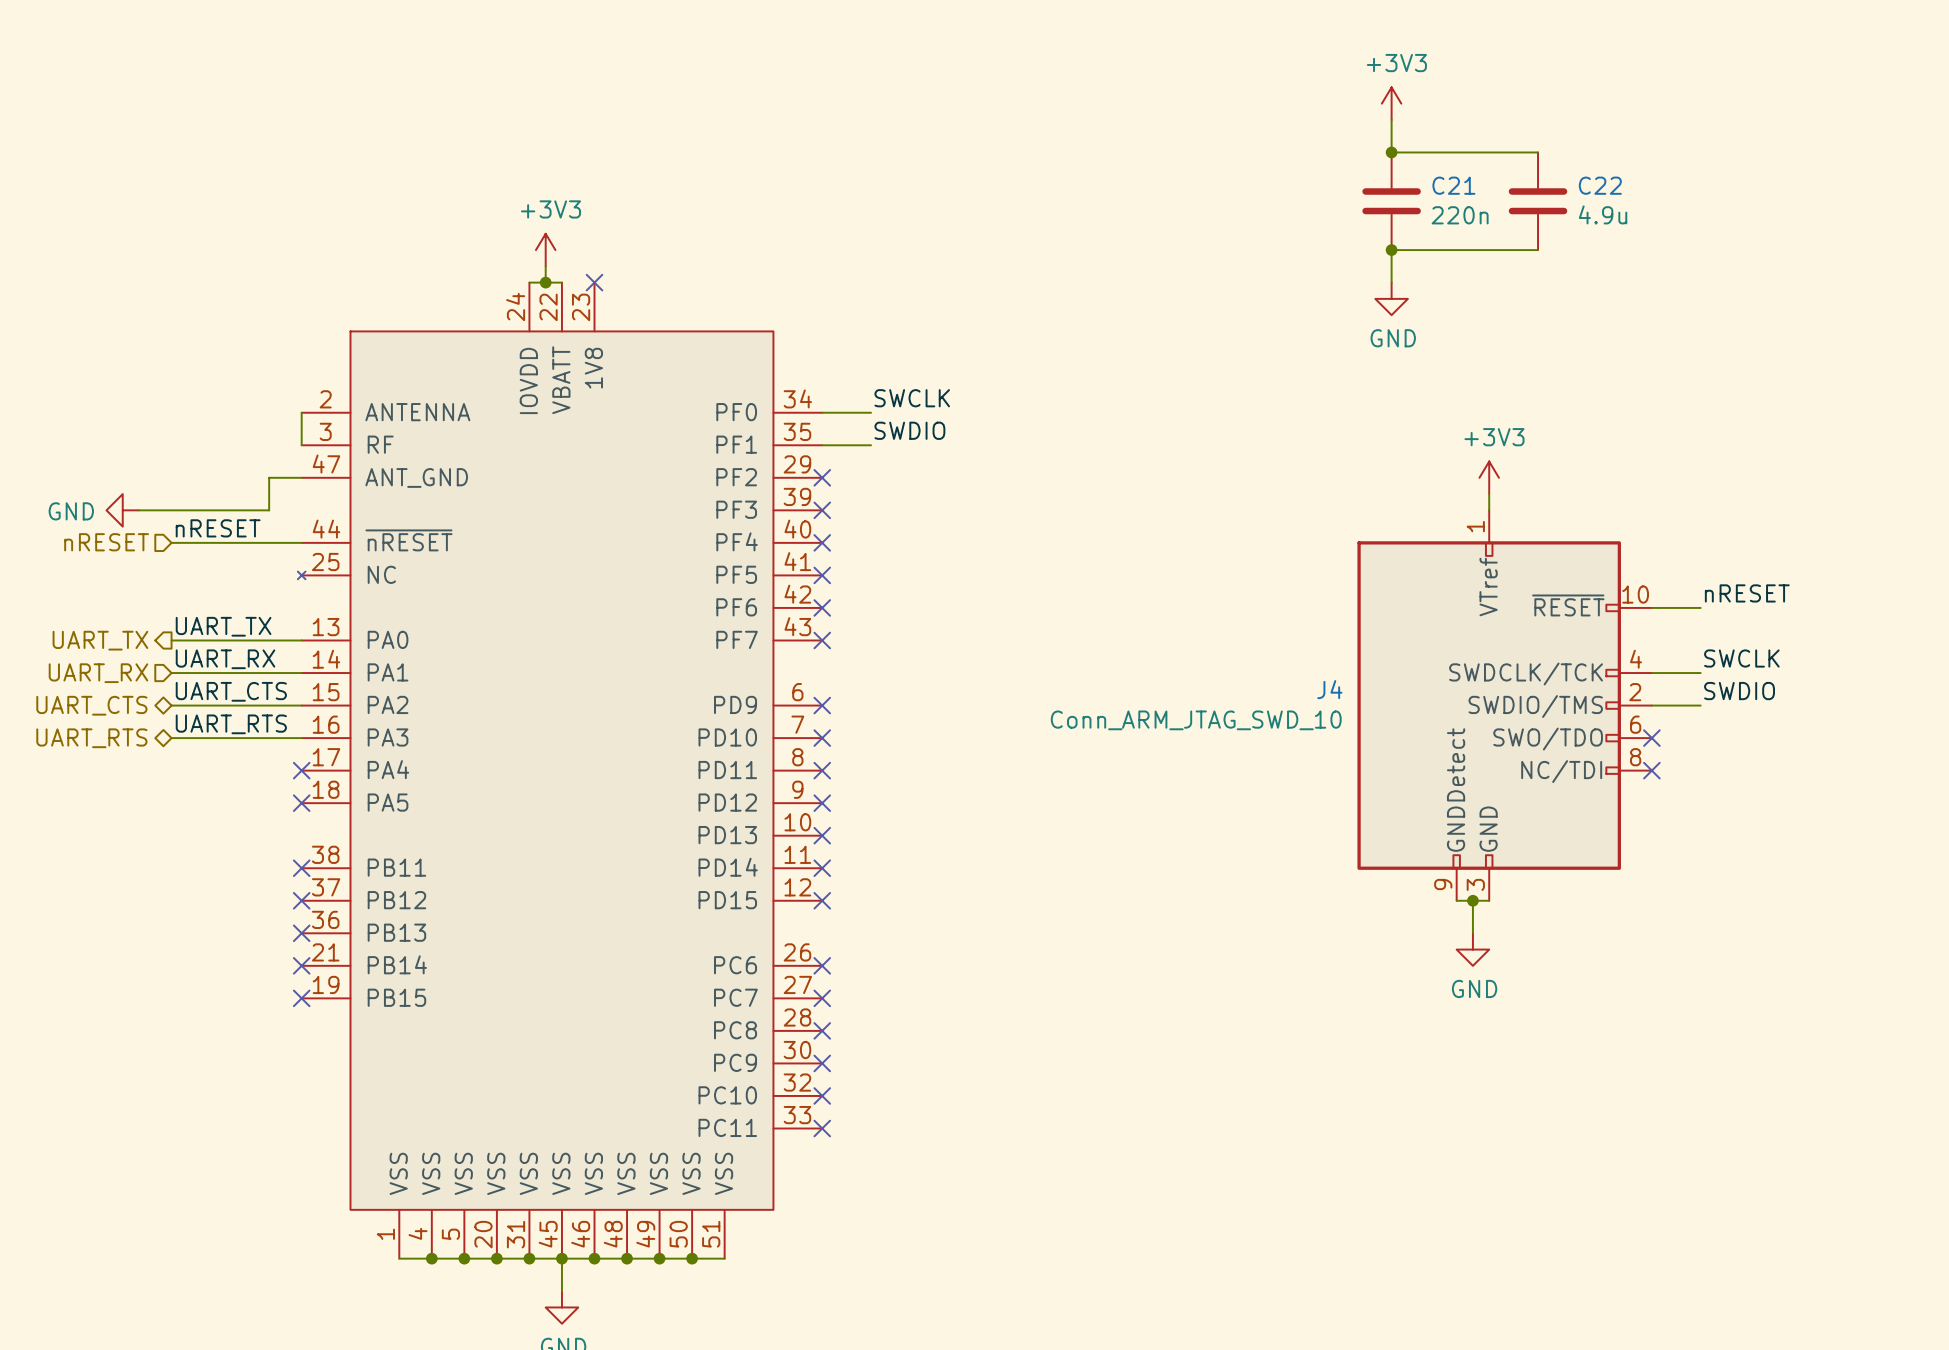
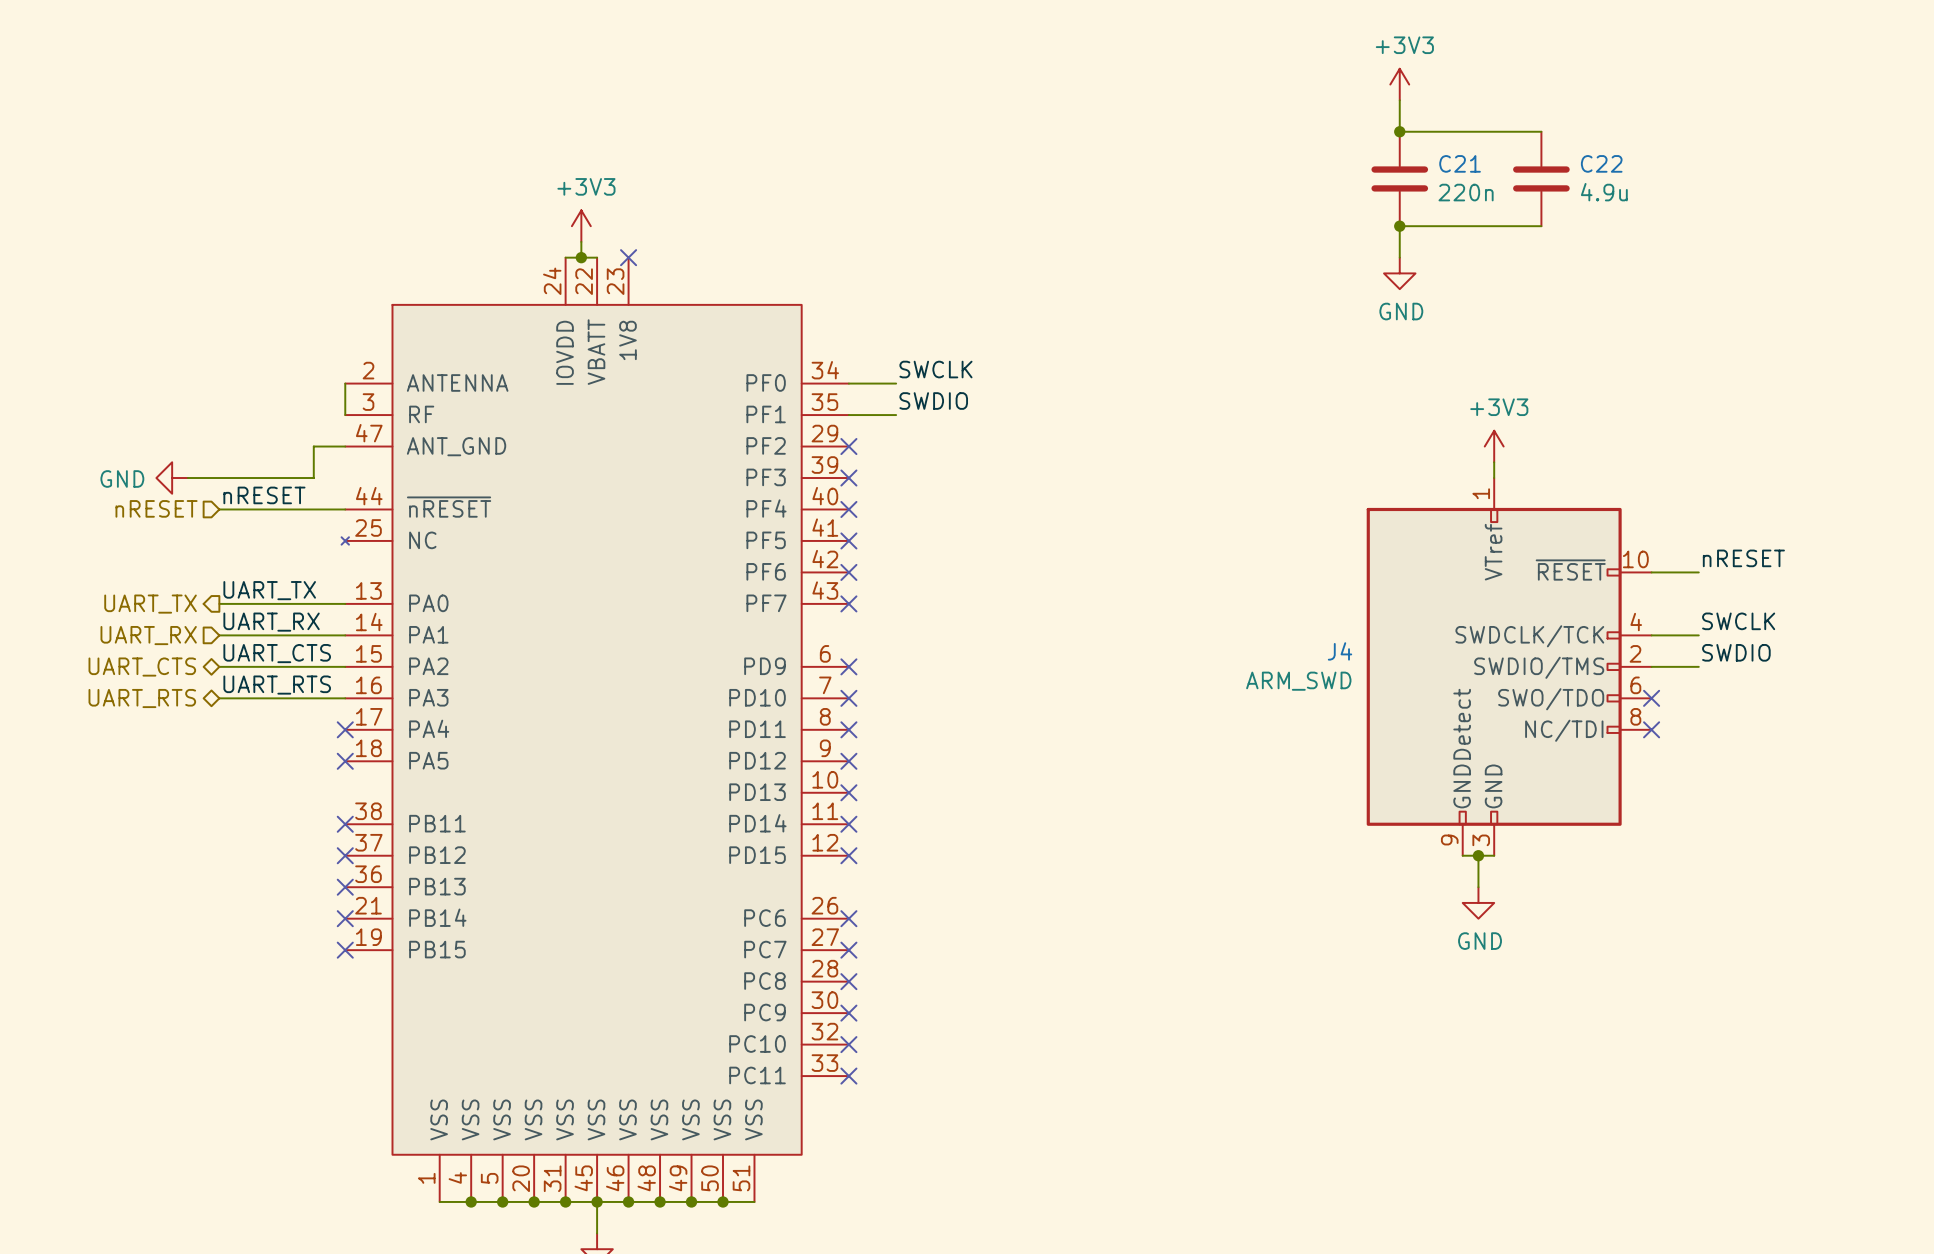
J4 value: Conn_ARM_JTAG_SWD_10 (1196, 720) -> ARM_SWD (1298, 681)

